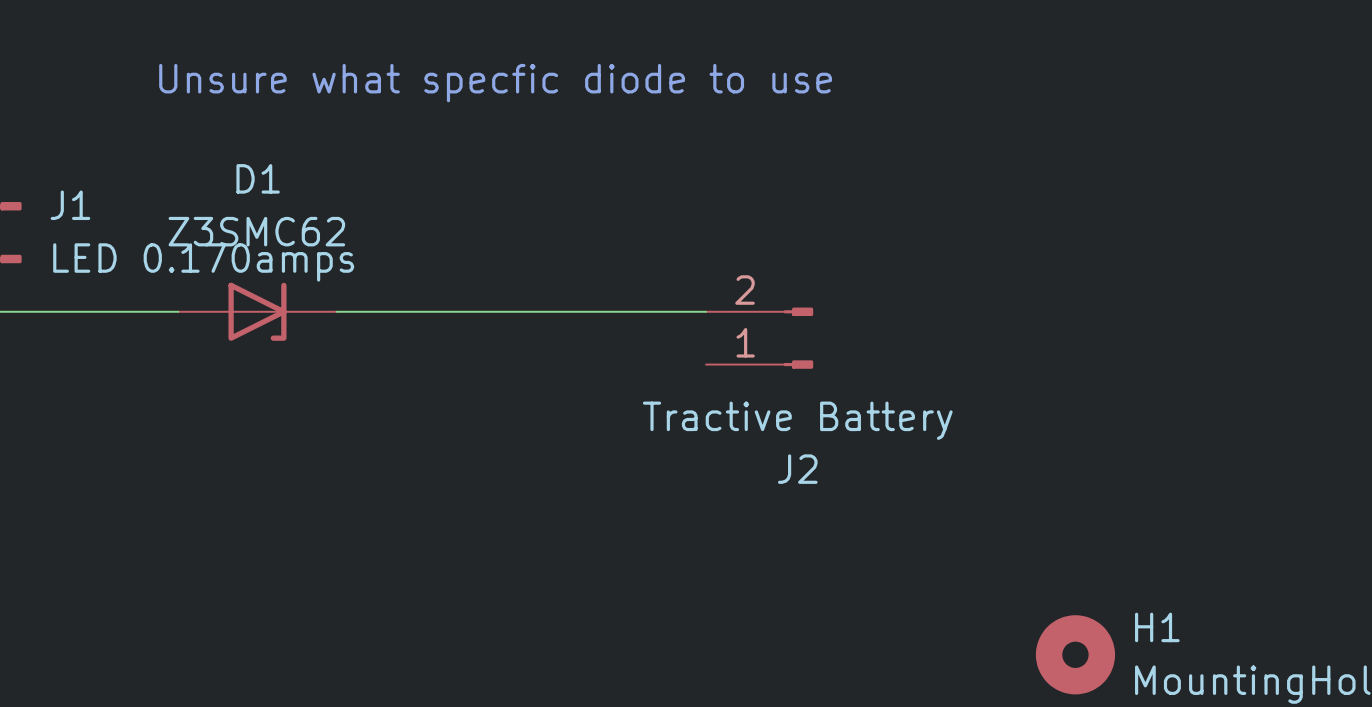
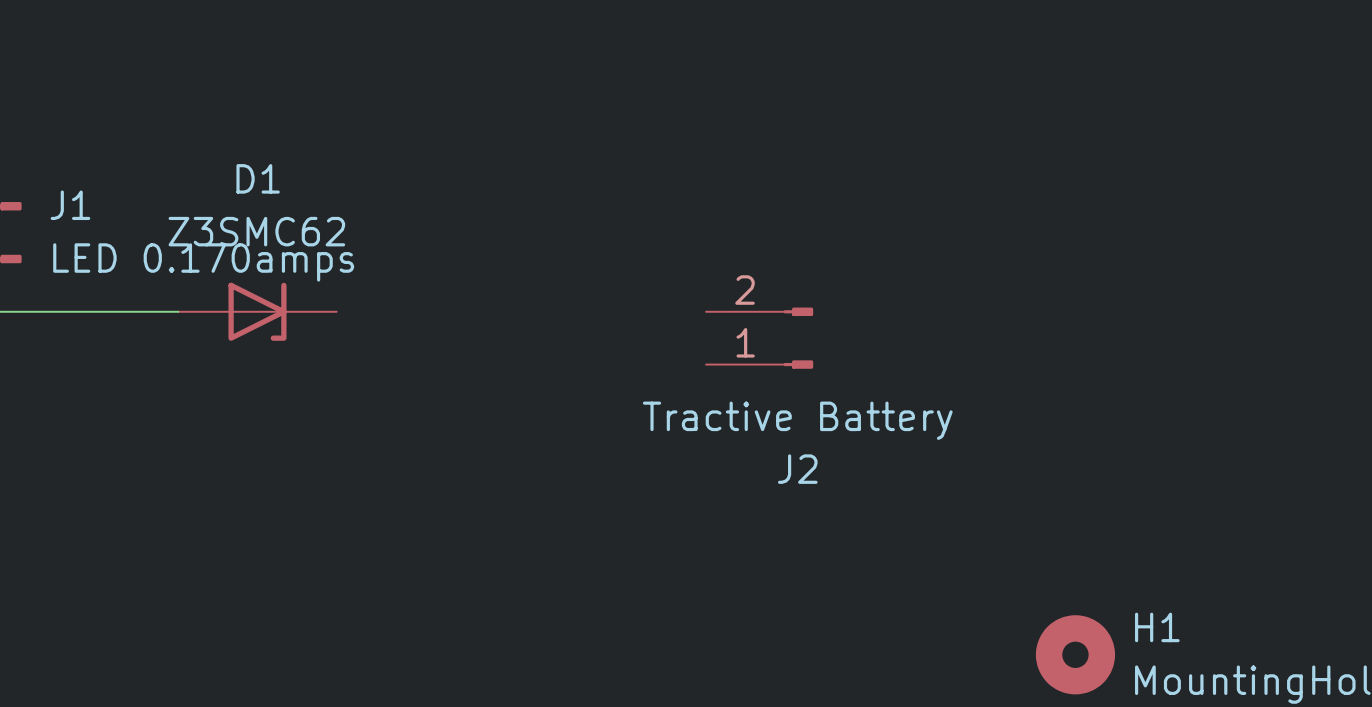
text: Unsure what specfic diode to use (495, 83) -> none
wire: (336, 311) (706, 311) -> none

